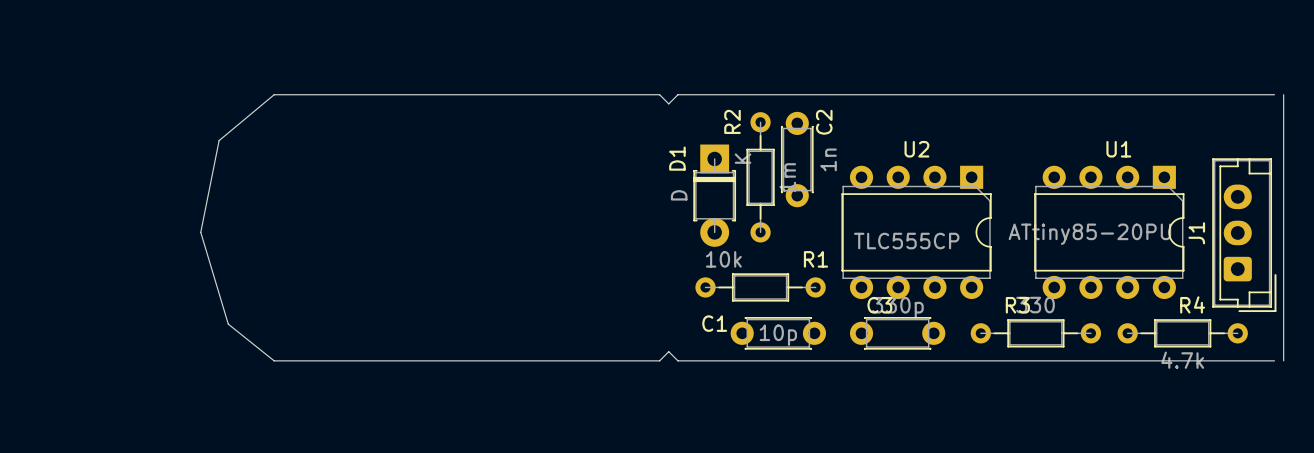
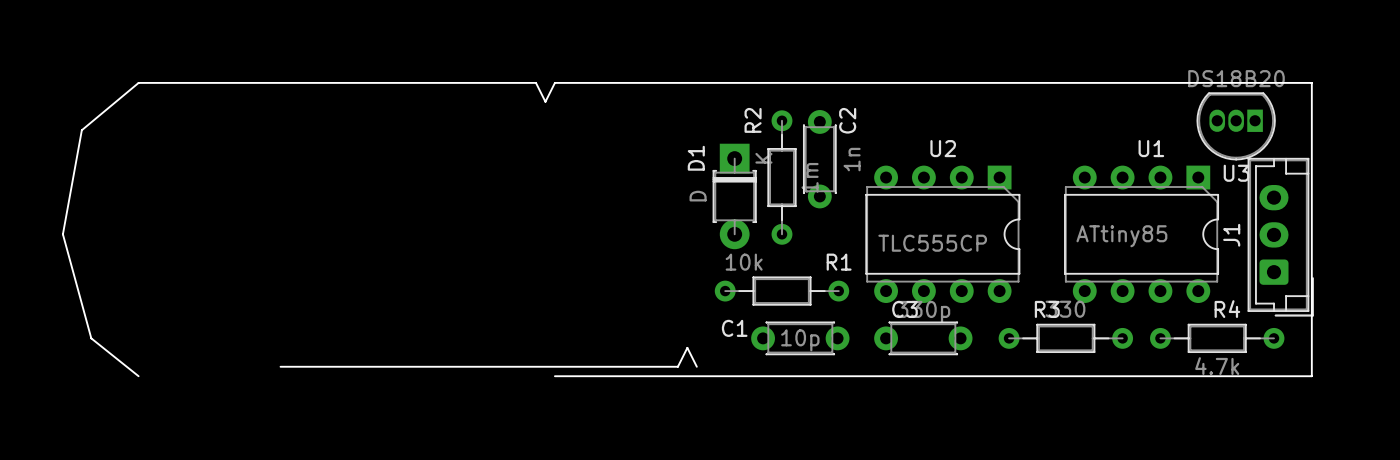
board edge: (1274, 94) (677, 94) (668, 103) (659, 94) (274, 94) (219, 140) (200, 232) (228, 324) (274, 360) -> none
board edge: (1283, 94) (1283, 360) -> none
U3: none -> DS18B20 (1236, 126)
U1 value: ATtiny85-20PU (1089, 234) -> ATtiny85 (1121, 236)
board edge: (659, 360) (668, 351) (677, 360) (1274, 360) -> (677, 366) (687, 347) (696, 366)
board edge: none -> (138, 376) (91, 338) (62, 234) (81, 130) (138, 82) (536, 82) (545, 101) (554, 82) (1311, 82) (1311, 376) (554, 376)

